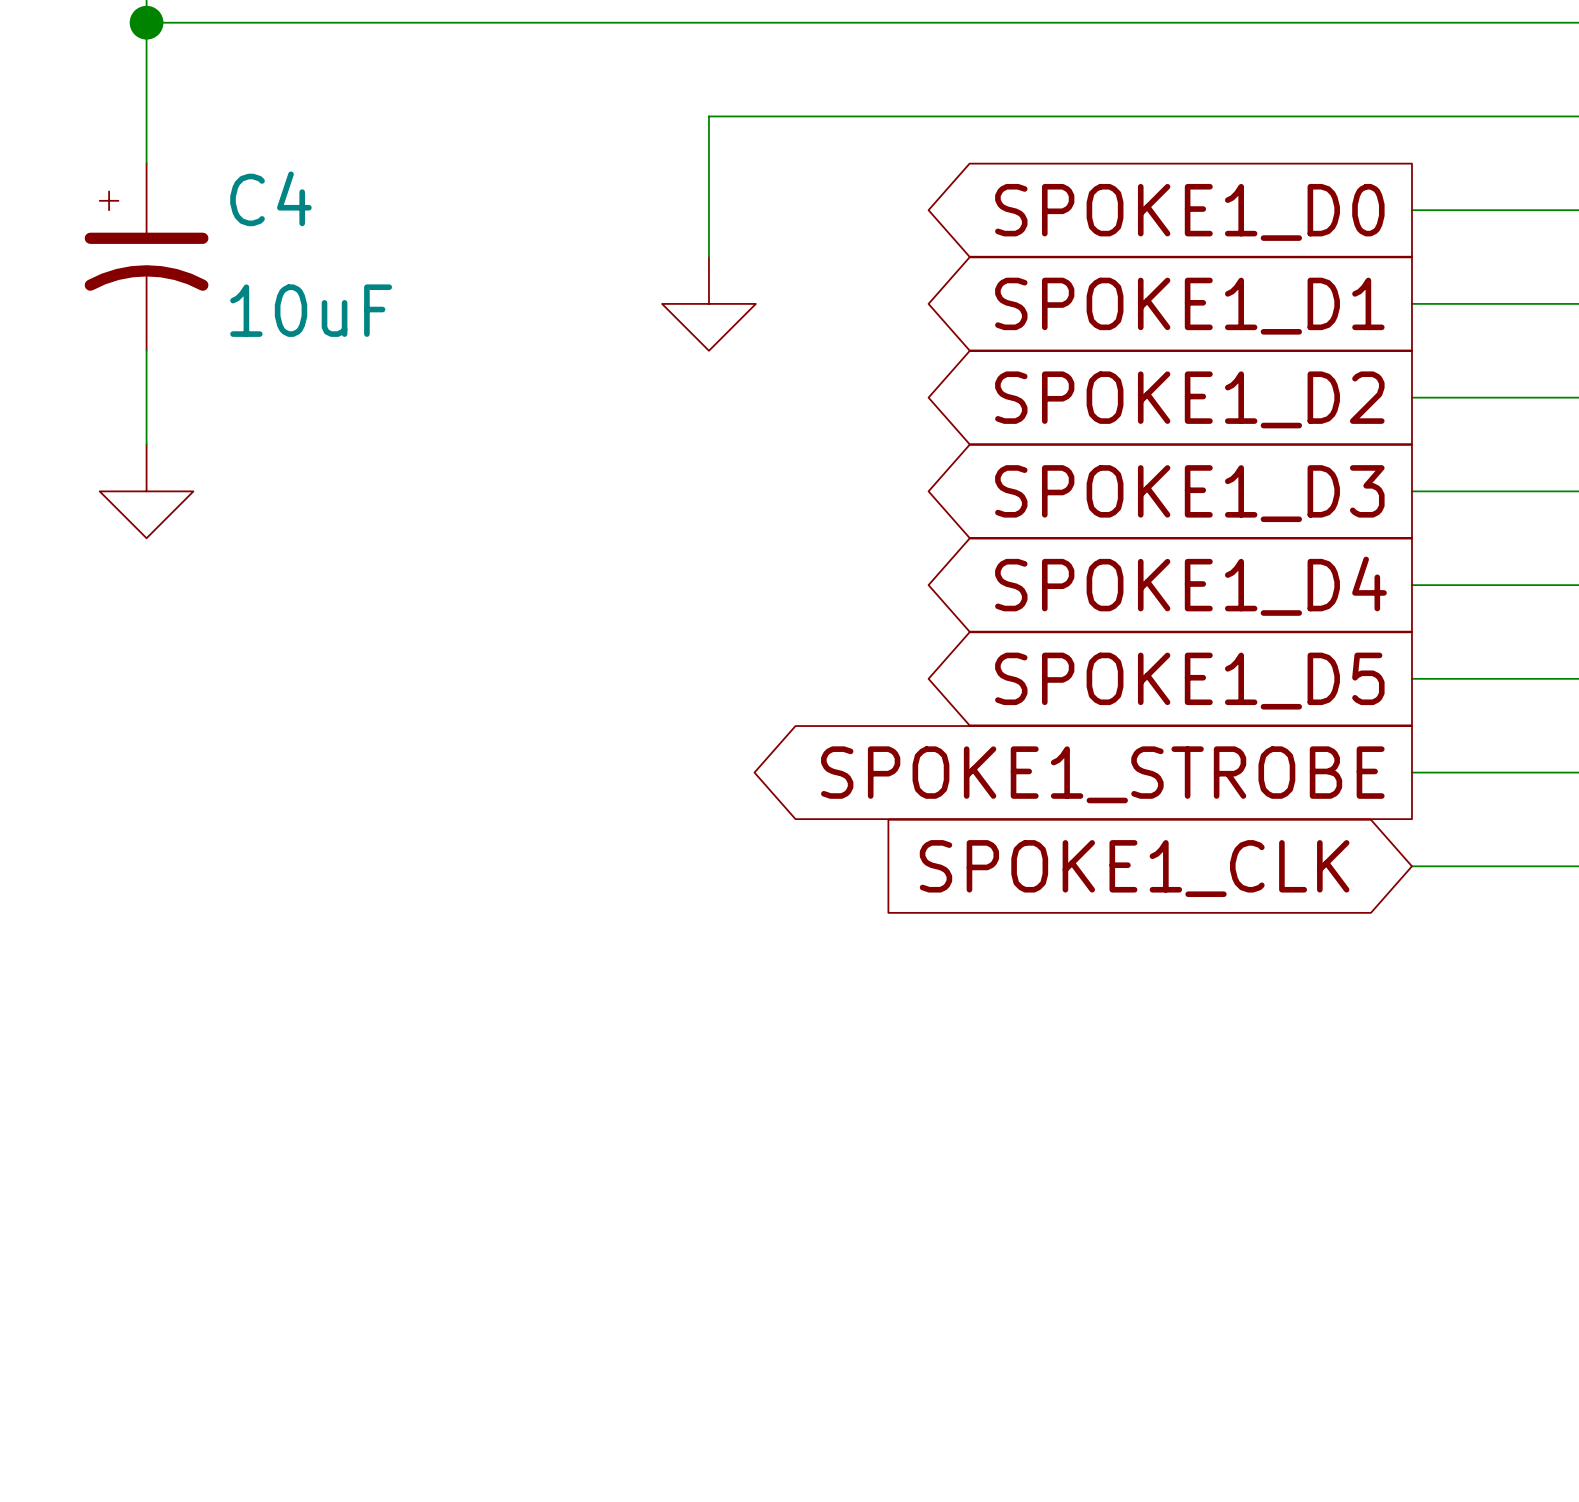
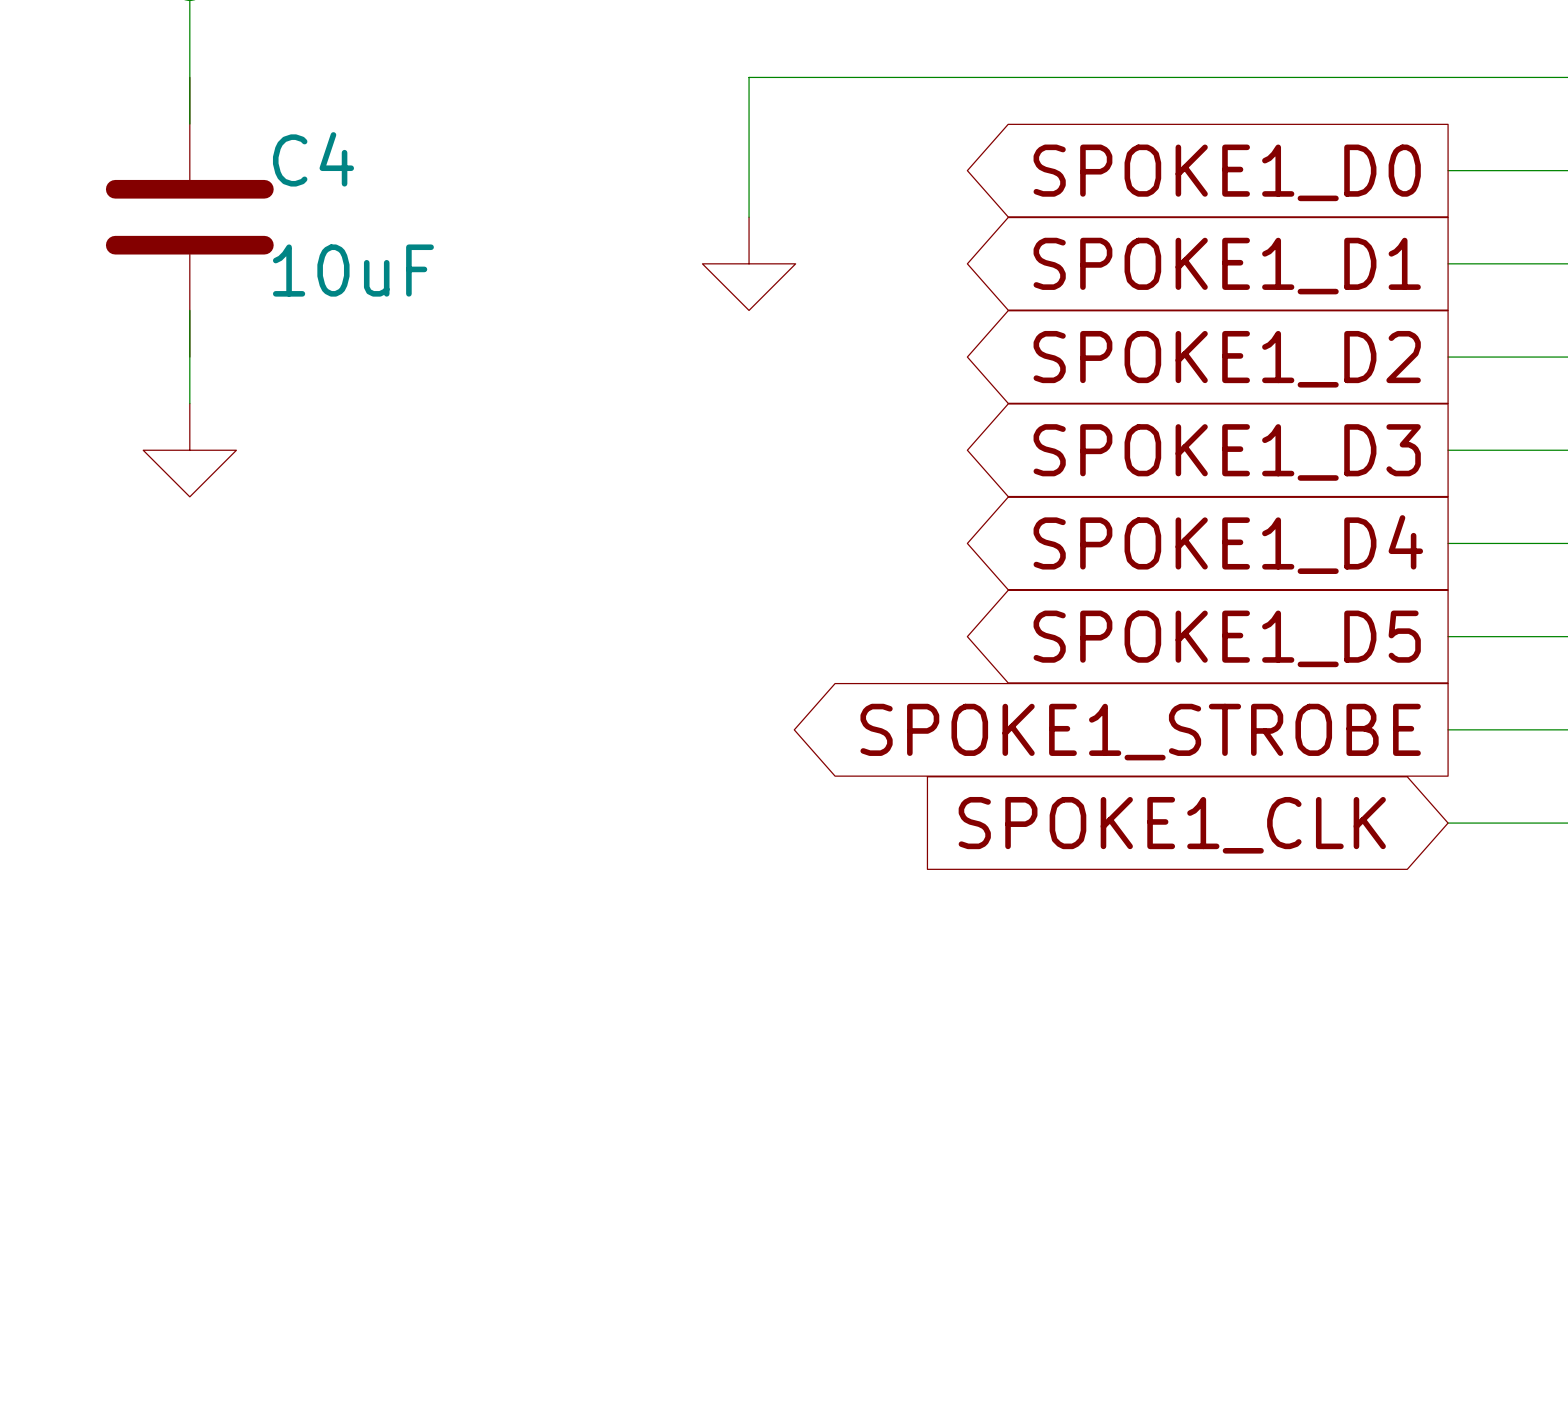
C4 symbol: [84, 163, 209, 351] -> [105, 77, 274, 358]

